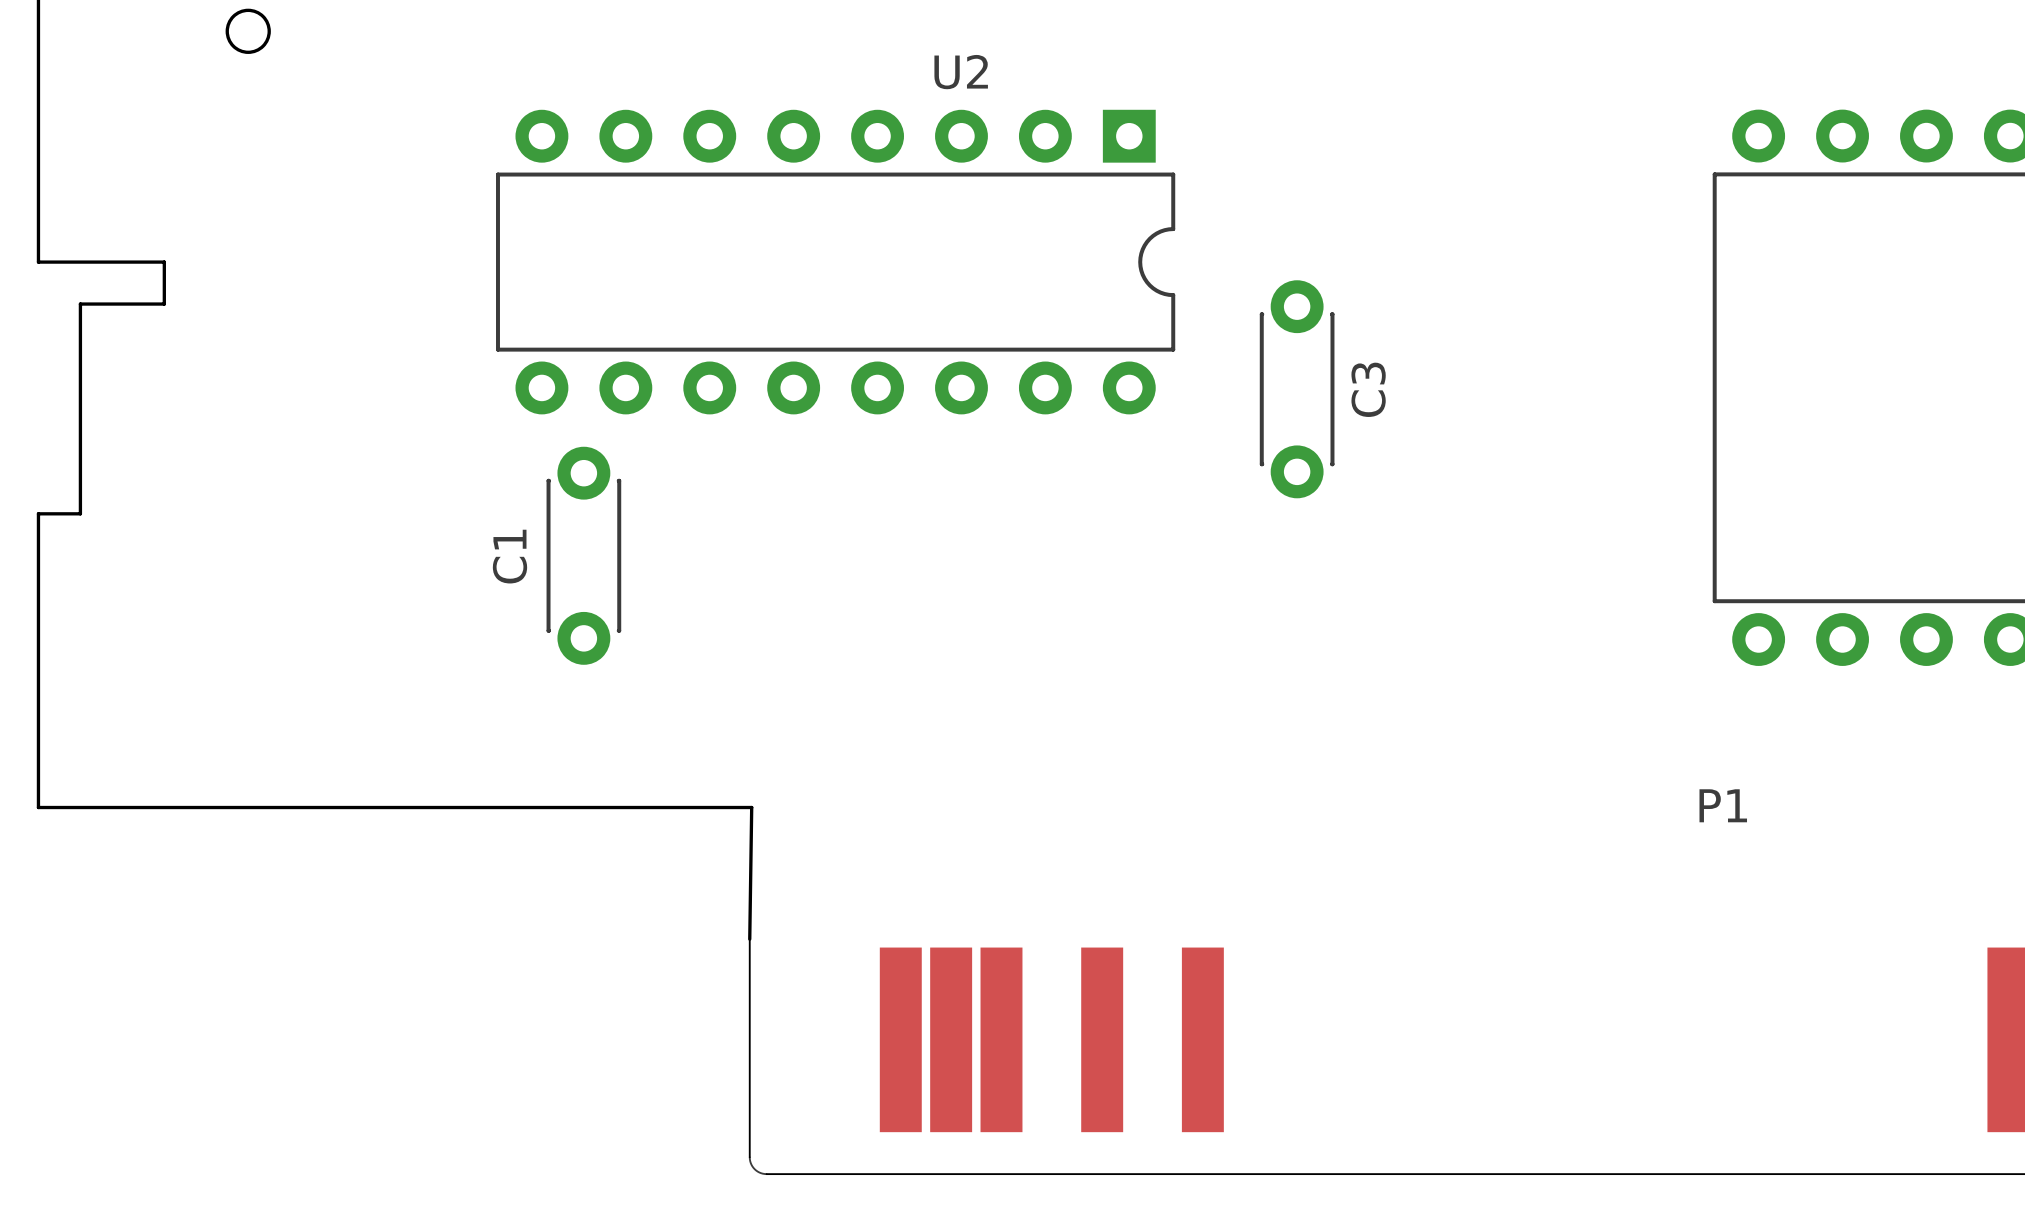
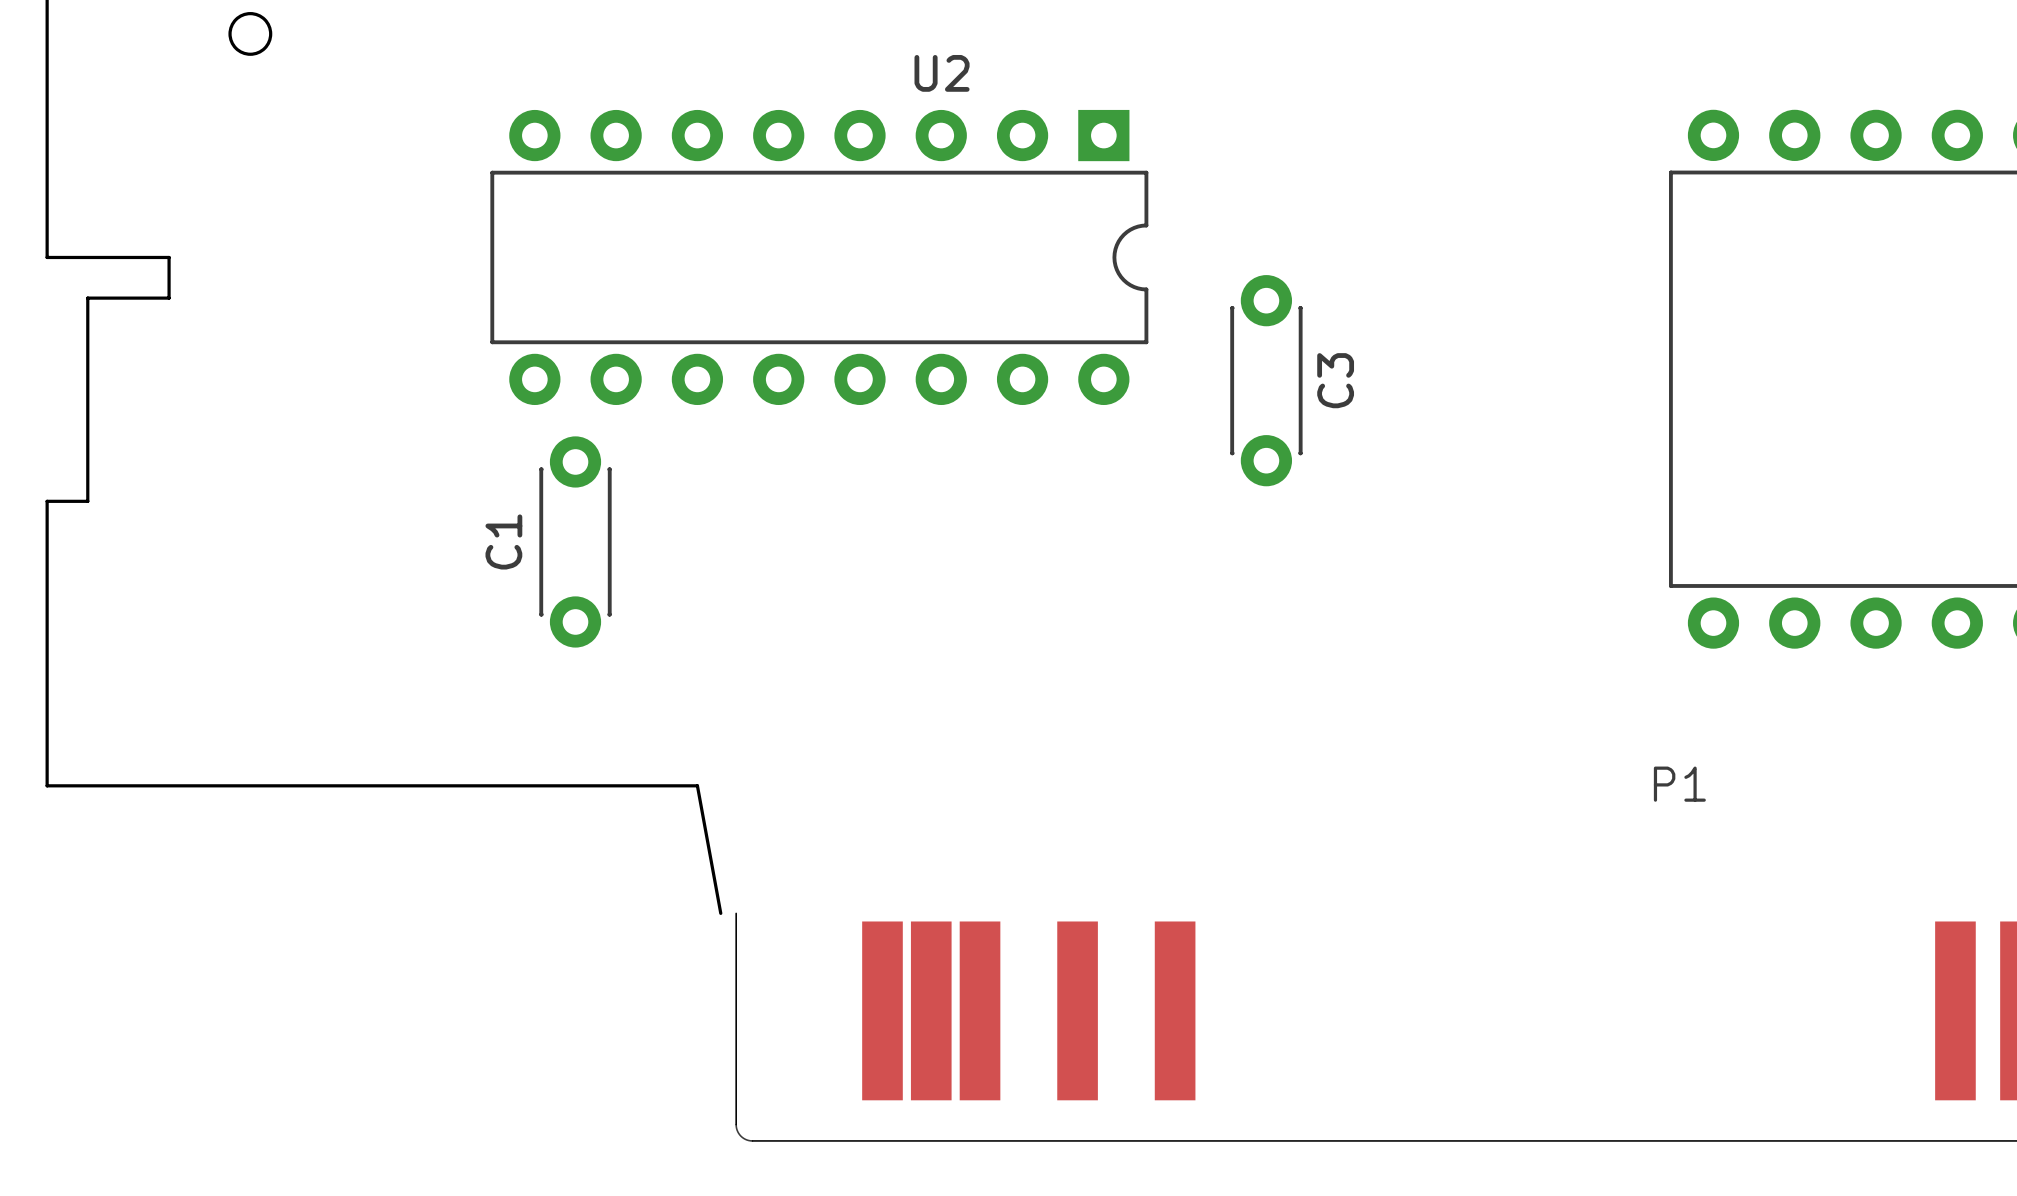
board edge: (709, 807) (751, 807) (749, 939) -> (697, 785) (720, 913)

